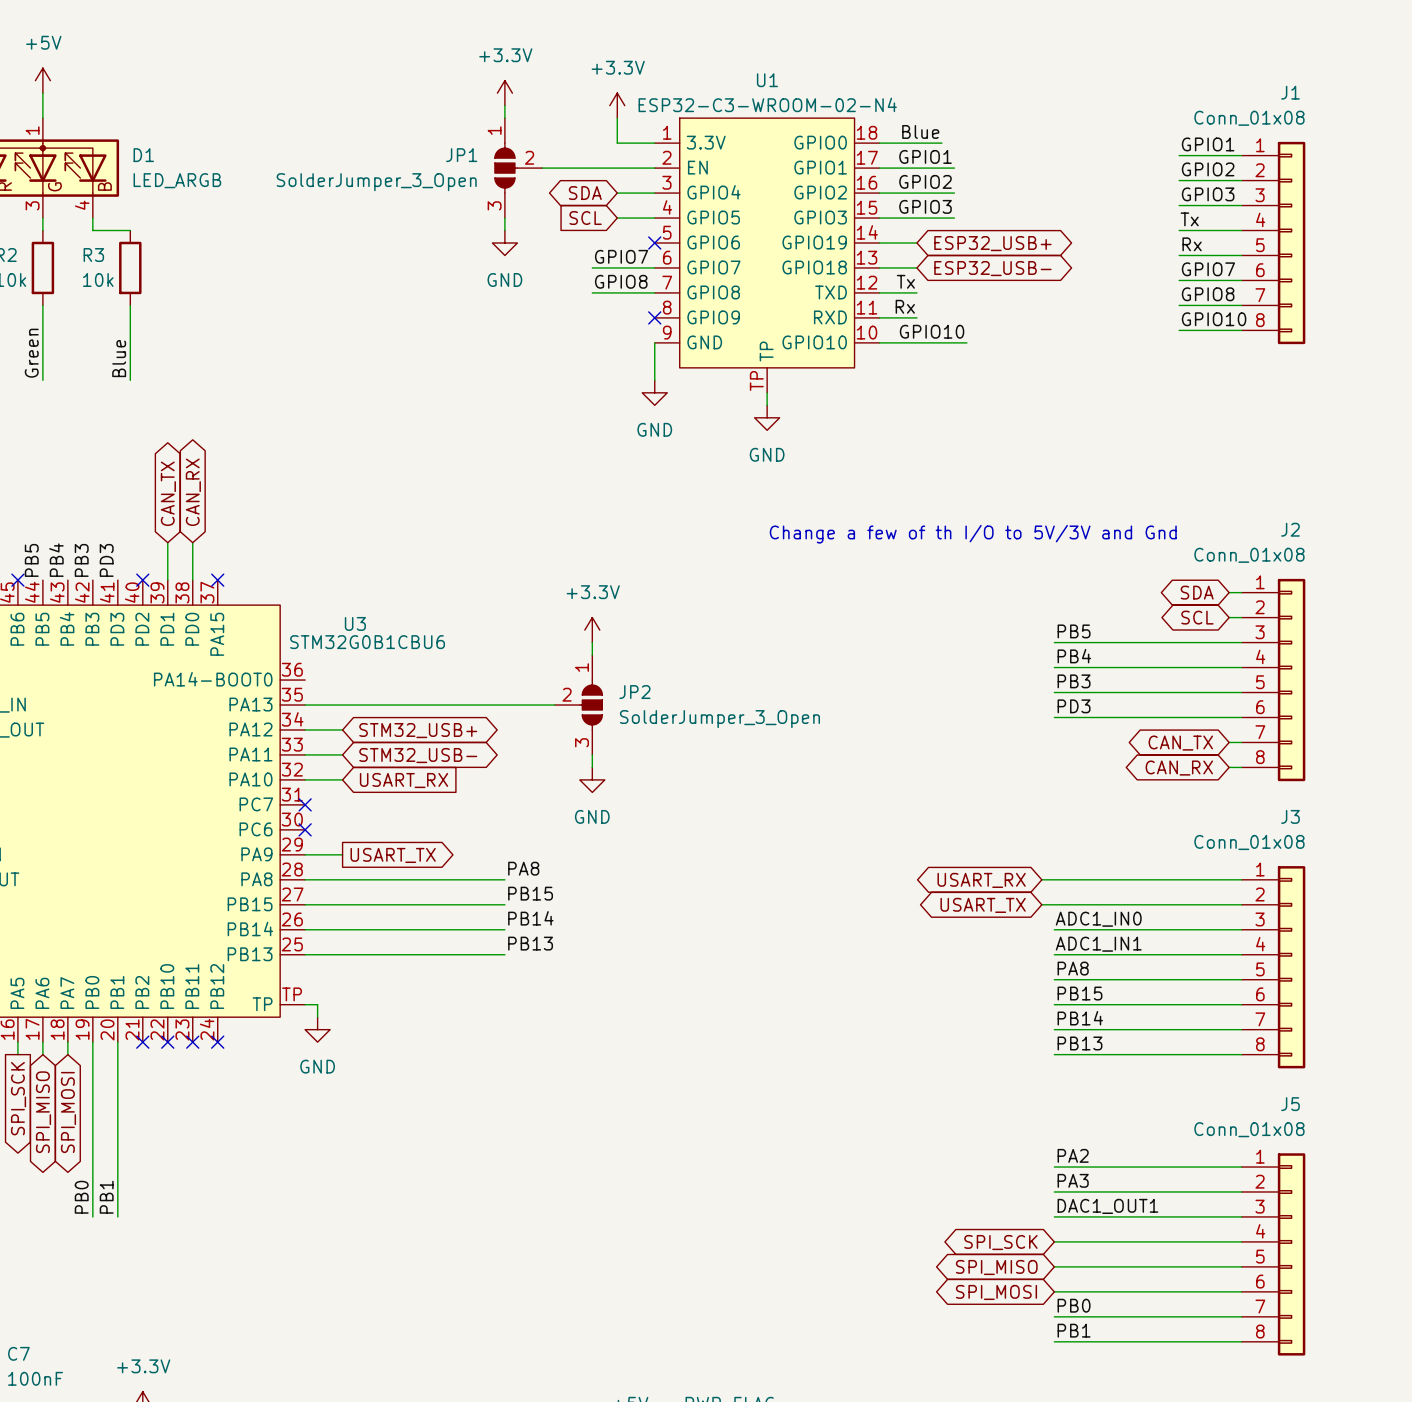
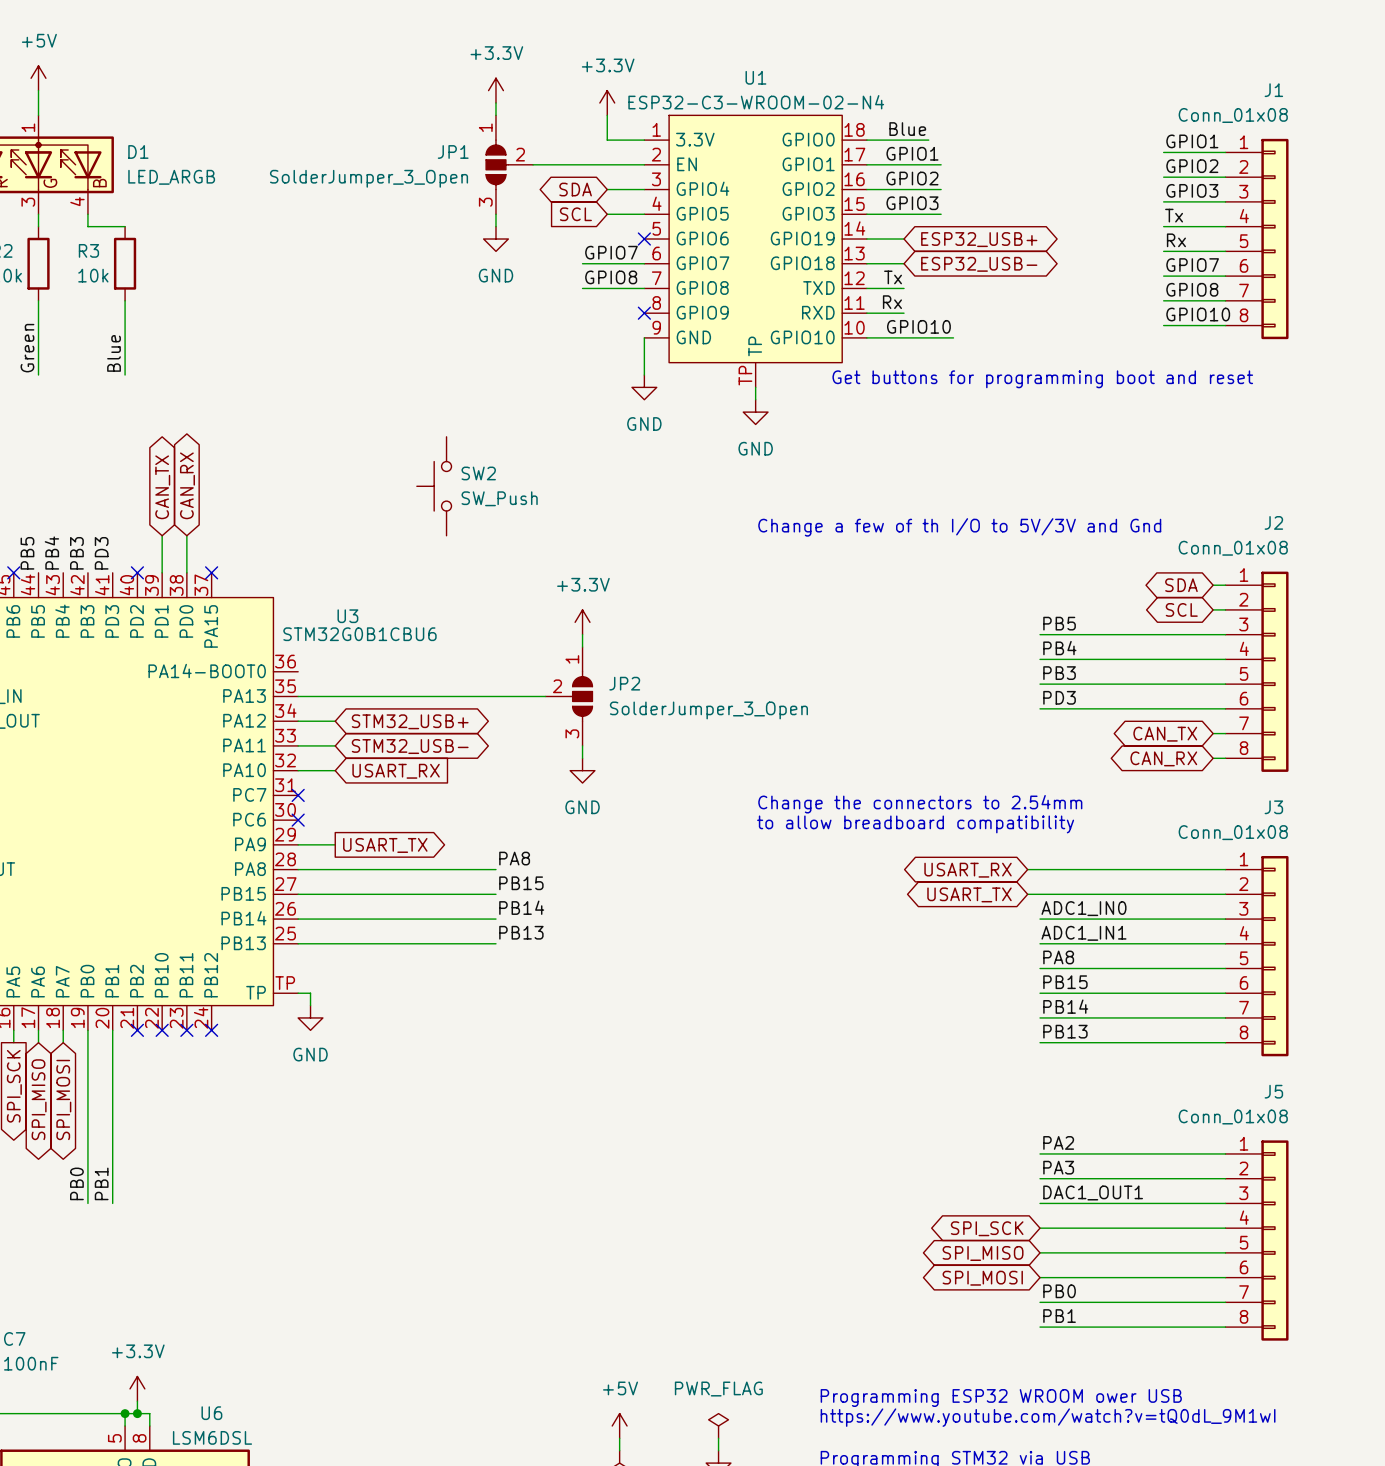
text: none -> Get buttons for programming boot and reset (1042, 379)
SW2: none -> SW_Push (434, 486)
text: none -> Change the connectors to 2.54mm (920, 804)
text: none -> to allow breadboard compatibility (915, 824)

